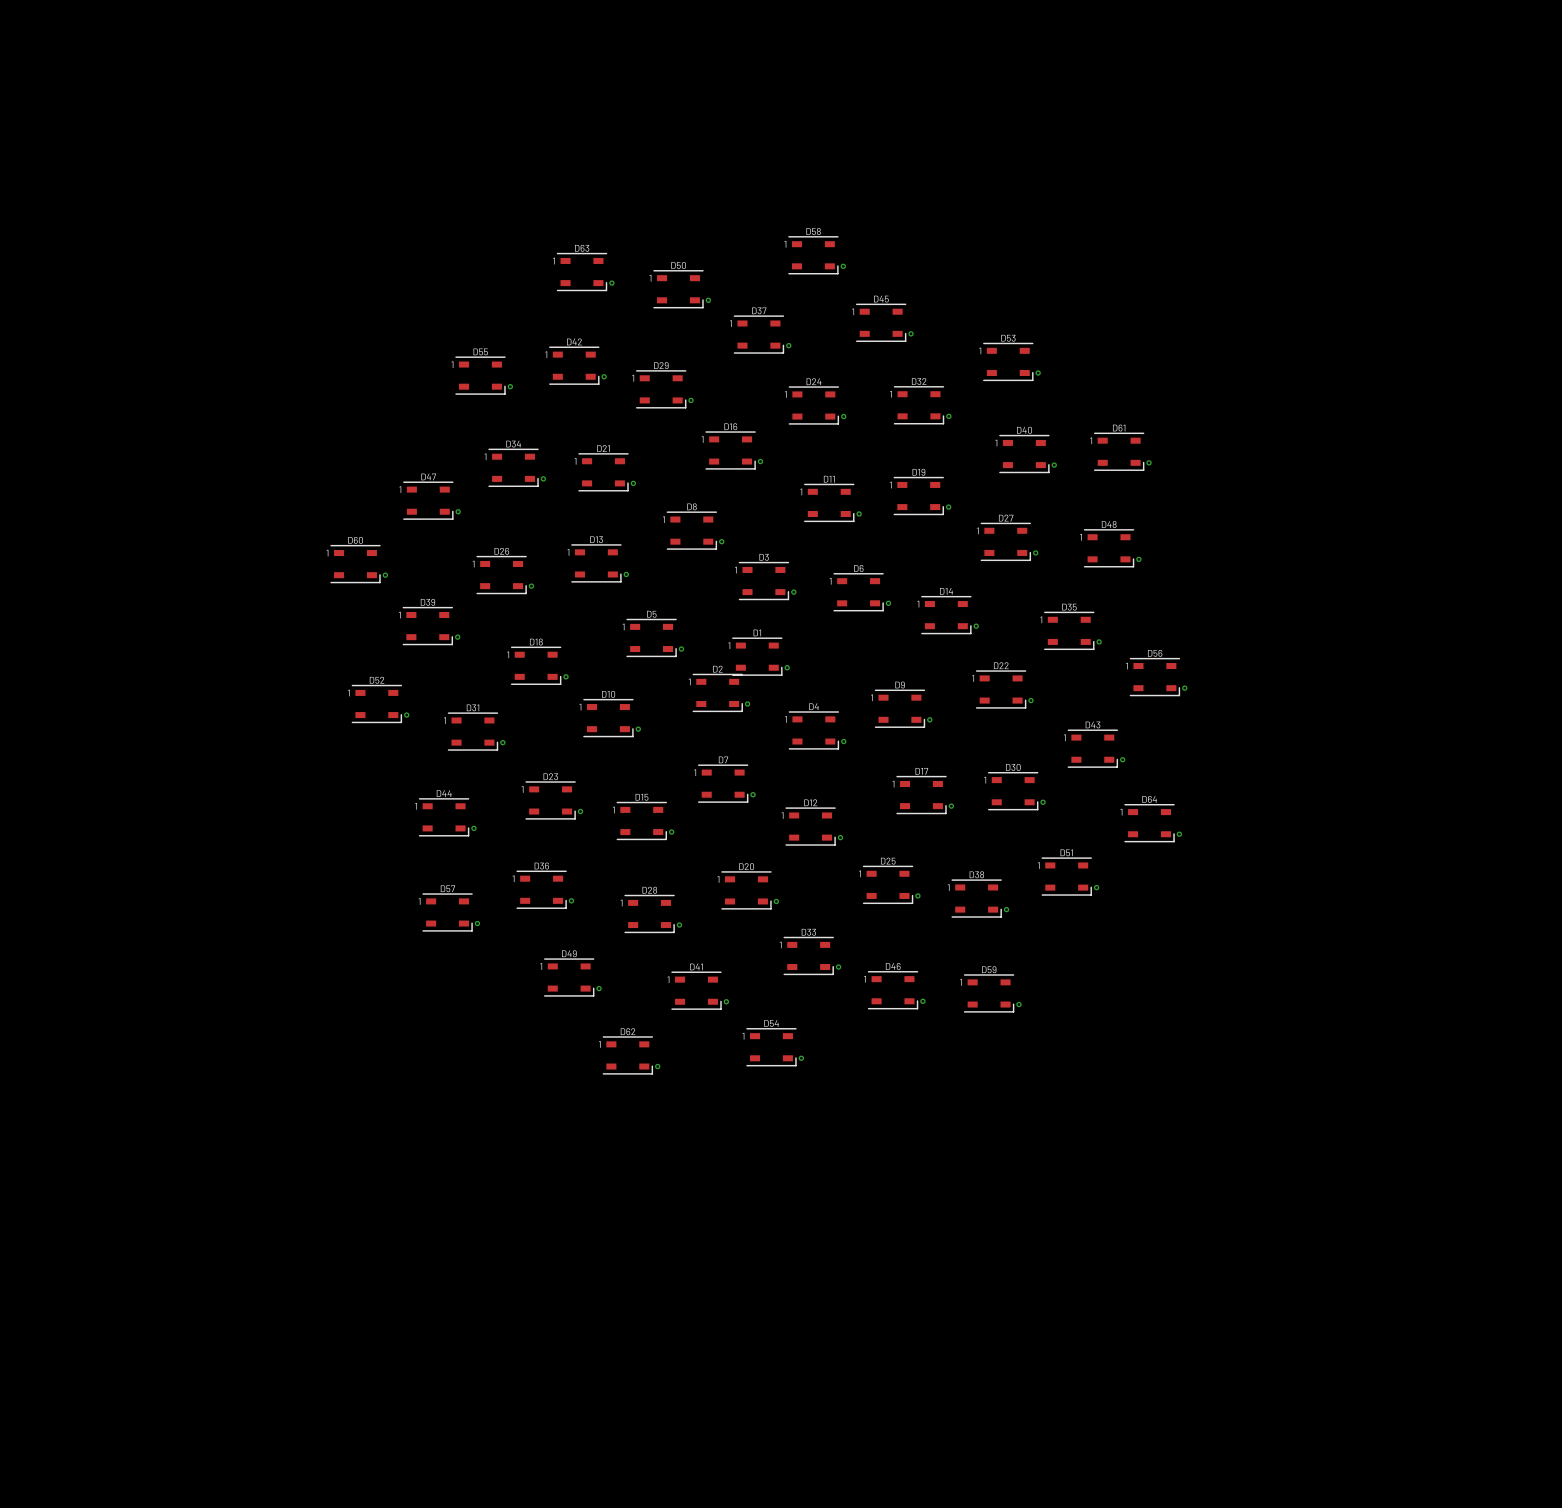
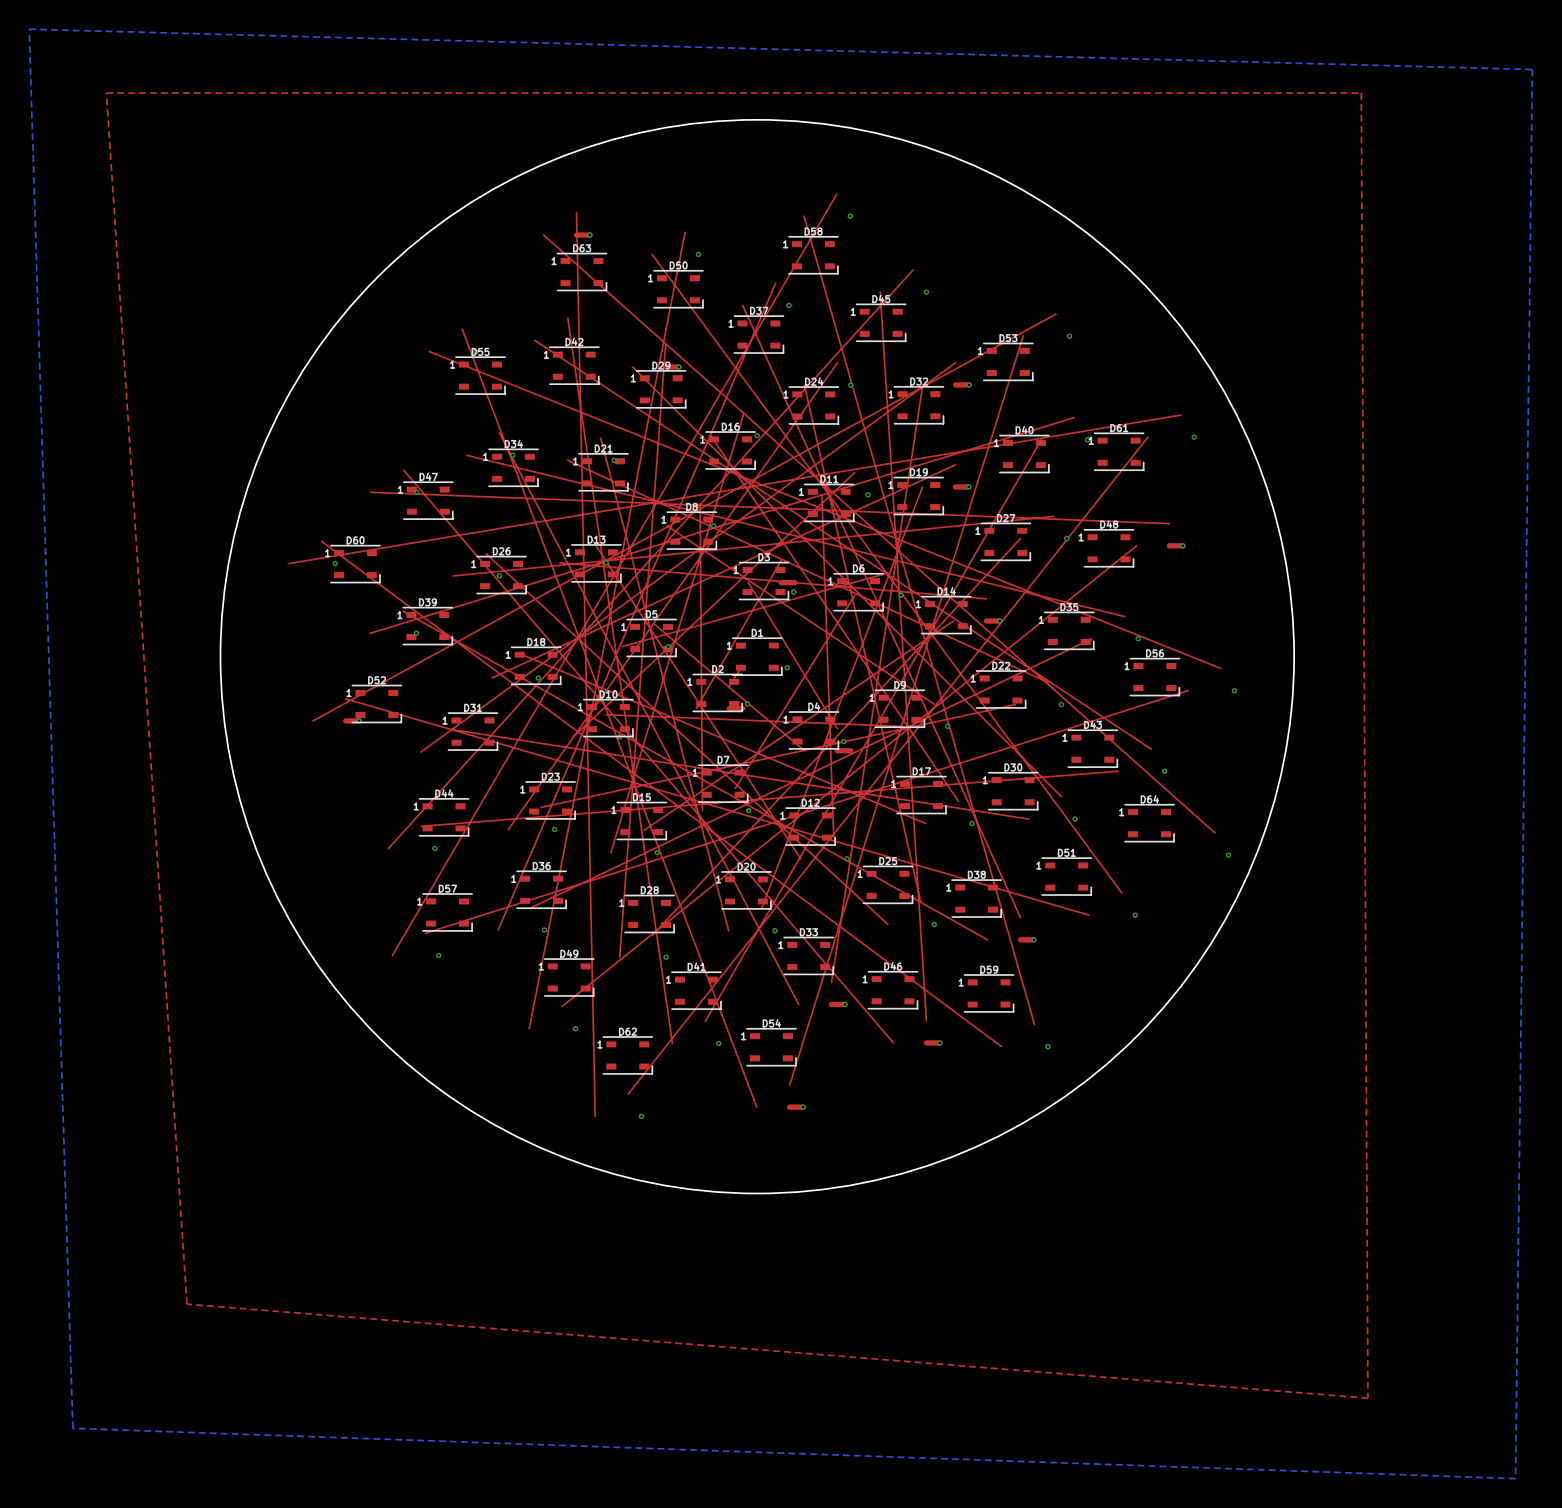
bottom zone outline: none -> (29, 29) (1532, 69) (1515, 1478) (72, 1428) (29, 29)
top zone outline: none -> (106, 92) (1361, 92) (1367, 1398) (186, 1304) (106, 92)
round board edge: none -> [220, 119, 1295, 1194]
top track: none -> (836, 194) (392, 955)
top track: none -> (576, 212) (595, 1116)
top track: none -> (803, 216) (1034, 1024)
via: none -> (850, 216)
top track: none -> (685, 232) (529, 1028)
top track: none -> (543, 235) (1214, 832)
top track: none -> (576, 235) (589, 235)
via: none -> (589, 235)
top track: none -> (652, 254) (1121, 892)
via: none -> (698, 254)
via: (843, 266) -> none
top track: none -> (913, 269) (388, 848)
via: (611, 283) -> none
top track: none -> (775, 283) (498, 929)
top track: none -> (880, 292) (926, 1020)
via: none -> (926, 292)
via: (708, 300) -> none
top track: none -> (742, 305) (1020, 917)
via: none -> (789, 305)
top track: none -> (1056, 314) (312, 720)
top track: none -> (567, 318) (672, 1043)
top track: none -> (462, 329) (756, 1107)
via: (911, 333) -> none
top track: none -> (1023, 336) (789, 1084)
via: none -> (1069, 336)
top track: none -> (534, 340) (1151, 749)
top track: none -> (665, 344) (619, 957)
via: (788, 345) -> none
top track: none -> (429, 351) (1221, 668)
via: none -> (475, 351)
top track: none -> (955, 362) (421, 752)
top track: none -> (837, 363) (508, 829)
top track: none -> (632, 367) (1061, 796)
top track: none -> (665, 367) (679, 367)
via: (1038, 373) -> none
via: (604, 376) -> none
top track: none -> (922, 384) (831, 982)
top track: none -> (955, 384) (969, 384)
via: none -> (969, 384)
top track: none -> (804, 385) (920, 902)
via: (510, 386) -> none
via position: (691, 400) -> (679, 367)
top track: none -> (743, 413) (610, 852)
top track: none -> (1180, 415) (288, 563)
via position: (843, 416) -> (850, 385)
via: (948, 416) -> none
top track: none -> (1074, 417) (370, 633)
top track: none -> (499, 433) (798, 1004)
top track: none -> (710, 435) (958, 801)
top track: none -> (1147, 437) (628, 1094)
via: none -> (1194, 437)
top track: none -> (600, 438) (728, 930)
top track: none -> (1041, 439) (705, 1021)
via: none -> (1087, 439)
top track: none -> (466, 455) (1124, 616)
via: none -> (512, 455)
top track: none -> (567, 460) (1048, 682)
via position: (760, 461) -> (757, 435)
via: (1149, 462) -> none
top track: none -> (955, 464) (492, 678)
via: (1054, 465) -> none
top track: none -> (403, 470) (893, 1042)
top track: none -> (854, 472) (573, 736)
via: (543, 478) -> none
via position: (633, 483) -> (614, 460)
top track: none -> (922, 487) (761, 908)
top track: none -> (955, 487) (968, 487)
top track: none -> (370, 492) (1169, 523)
via: none -> (417, 492)
top track: none -> (821, 494) (833, 836)
top track: none -> (700, 503) (702, 810)
via position: (948, 507) -> (968, 487)
via: (458, 511) -> none
via position: (859, 513) -> (868, 494)
top track: none -> (1053, 516) (453, 575)
top track: none -> (667, 525) (934, 704)
top track: none -> (1020, 538) (652, 935)
top track: none -> (592, 540) (800, 858)
top track: none -> (321, 541) (1001, 1046)
via position: (721, 541) -> (713, 525)
top track: none -> (1136, 545) (562, 1006)
top track: none -> (1169, 545) (1182, 545)
via: none -> (1182, 545)
via position: (1035, 552) -> (1066, 538)
top track: none -> (486, 553) (887, 924)
via: (1138, 559) -> none
top track: none -> (781, 560) (696, 708)
top track: none -> (559, 562) (986, 598)
via: none -> (335, 563)
top track: none -> (887, 573) (621, 646)
via position: (626, 574) -> (606, 562)
via: (385, 575) -> none
top track: none -> (748, 582) (837, 728)
top track: none -> (781, 582) (794, 582)
via position: (531, 586) -> (499, 575)
top track: none -> (854, 595) (735, 788)
via position: (888, 603) -> (901, 595)
top track: none -> (403, 611) (987, 939)
top track: none -> (953, 620) (643, 830)
top track: none -> (986, 620) (999, 620)
top track: none -> (654, 624) (804, 750)
via position: (976, 626) -> (999, 620)
via: none -> (416, 633)
via: (457, 637) -> none
top track: none -> (1091, 638) (531, 907)
via: none -> (1138, 638)
via: (1099, 641) -> none
via position: (681, 649) -> (668, 646)
top track: none -> (524, 655) (925, 823)
top track: none -> (740, 667) (729, 686)
via position: (566, 676) -> (538, 678)
via: (1184, 688) -> none
top track: none -> (1188, 690) (425, 933)
via: none -> (1234, 690)
top track: none -> (345, 698) (1088, 915)
via position: (1030, 700) -> (1061, 704)
top track: none -> (1015, 704) (541, 807)
top track: none -> (729, 708) (742, 708)
top track: none -> (606, 714) (901, 726)
via: (406, 715) -> none
via position: (929, 719) -> (947, 726)
top track: none -> (345, 720) (359, 720)
via: none -> (359, 720)
top track: none -> (453, 729) (1028, 819)
via position: (638, 729) -> (619, 736)
via: (502, 742) -> none
top track: none -> (837, 750) (850, 750)
via: (1122, 759) -> none
top track: none -> (1118, 771) (421, 826)
via: none -> (1164, 771)
via position: (753, 794) -> (748, 810)
via: (1043, 802) -> none
via position: (951, 806) -> (971, 823)
via position: (580, 811) -> (554, 829)
via: none -> (1075, 819)
via: (473, 828) -> none
via position: (671, 832) -> (657, 852)
via: (1179, 834) -> none
via position: (840, 837) -> (847, 858)
via: none -> (434, 848)
via: none -> (1228, 855)
via: (1096, 887) -> none
via position: (917, 895) -> (934, 924)
via: (571, 900) -> none
via position: (776, 901) -> (774, 930)
via: (1006, 909) -> none
via: none -> (1135, 915)
via: (477, 923) -> none
via position: (679, 925) -> (665, 957)
via: none -> (544, 929)
top track: none -> (1020, 939) (1033, 939)
via: none -> (1033, 939)
via: none -> (438, 955)
via: (838, 967) -> none
via: (599, 988) -> none
via: (726, 1001) -> none
via: (922, 1001) -> none
top track: none -> (831, 1004) (845, 1004)
via: none -> (845, 1004)
via: (1018, 1004) -> none
via: none -> (575, 1028)
top track: none -> (926, 1042) (939, 1042)
via: none -> (939, 1042)
via: none -> (718, 1043)
via: none -> (1047, 1046)
via: (801, 1058) -> none
via: (657, 1066) -> none
top track: none -> (789, 1107) (803, 1107)
via: none -> (803, 1107)
via: none -> (641, 1116)

